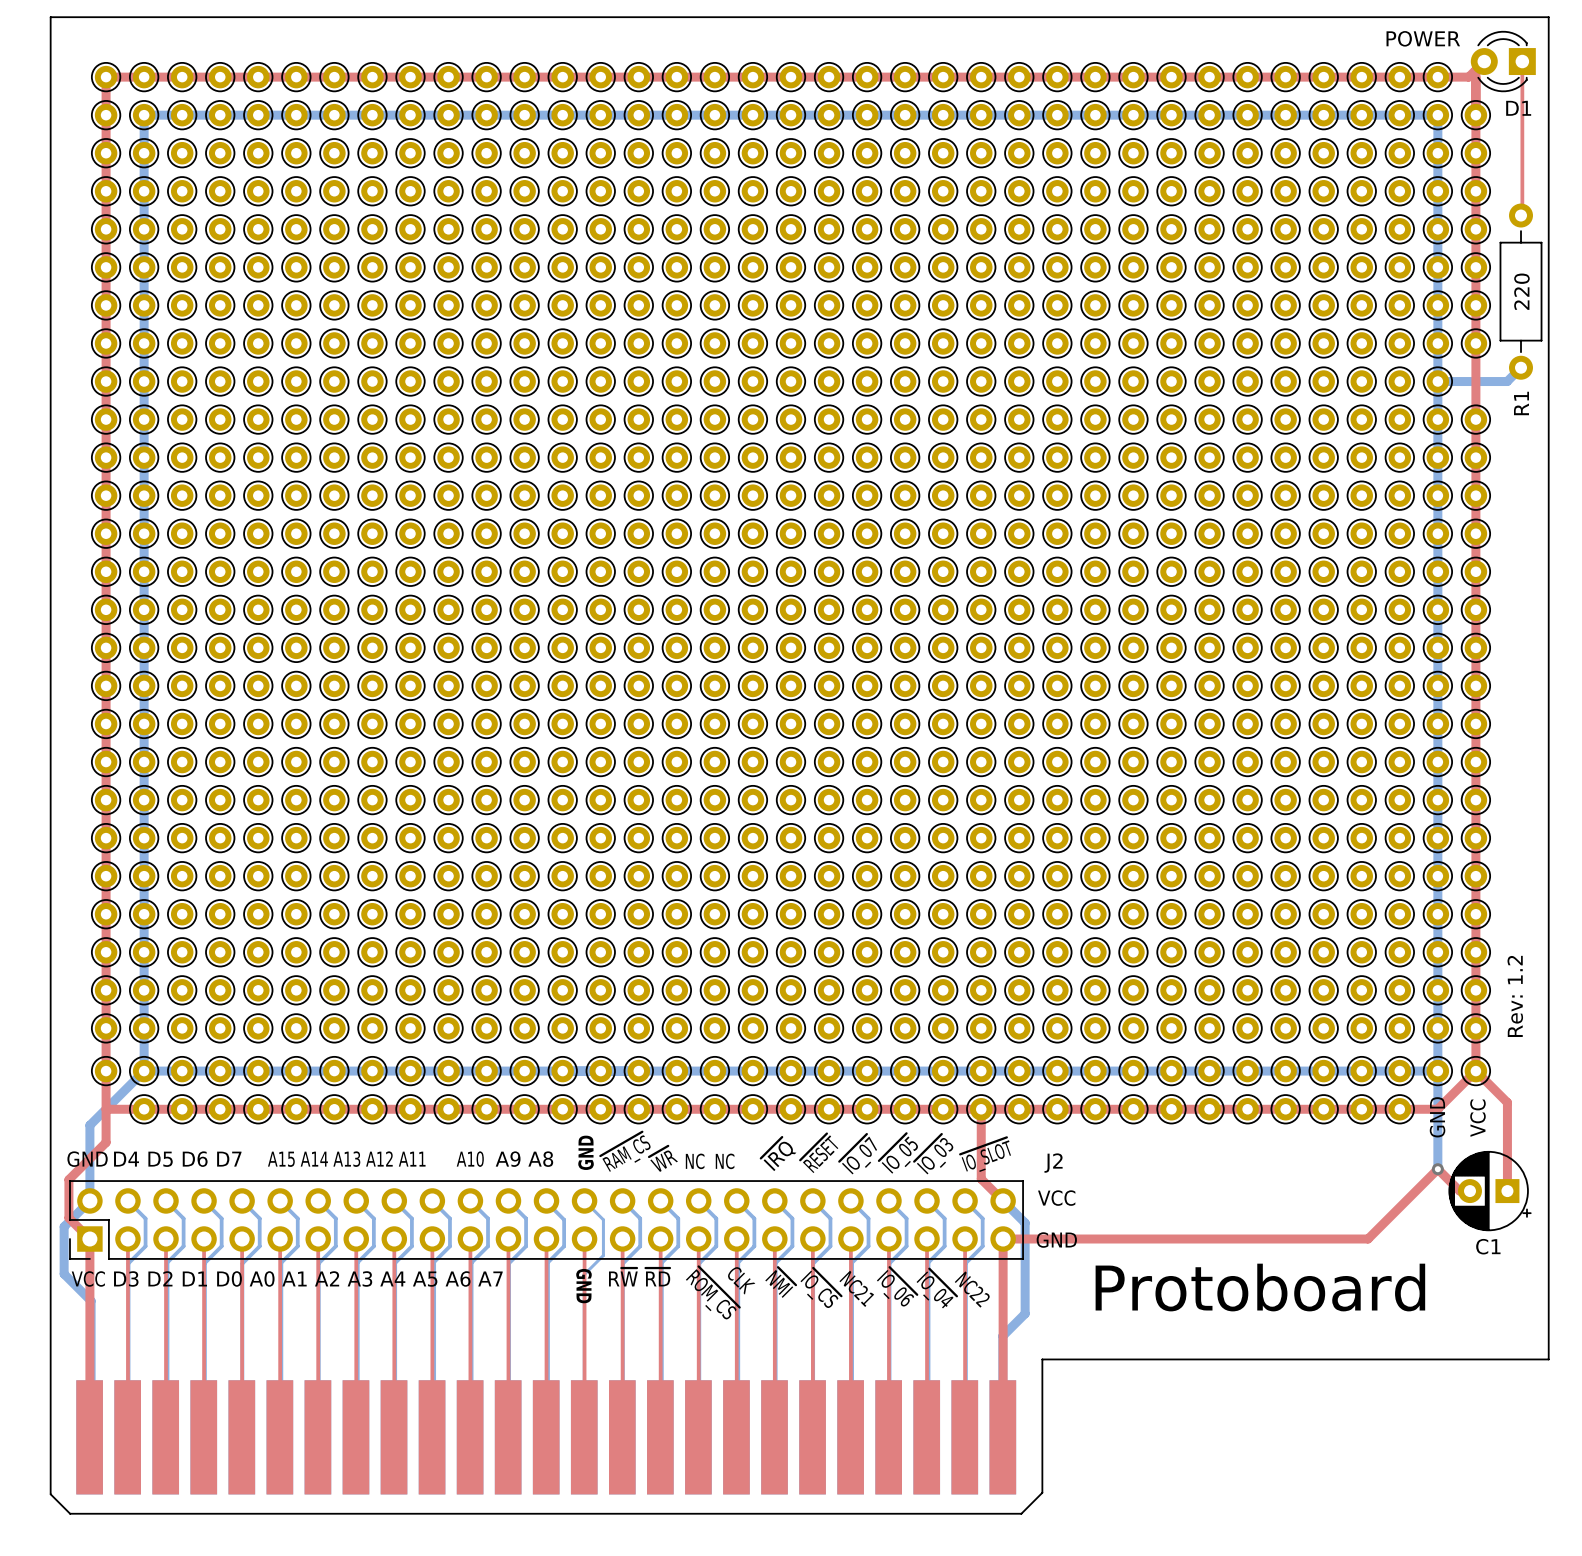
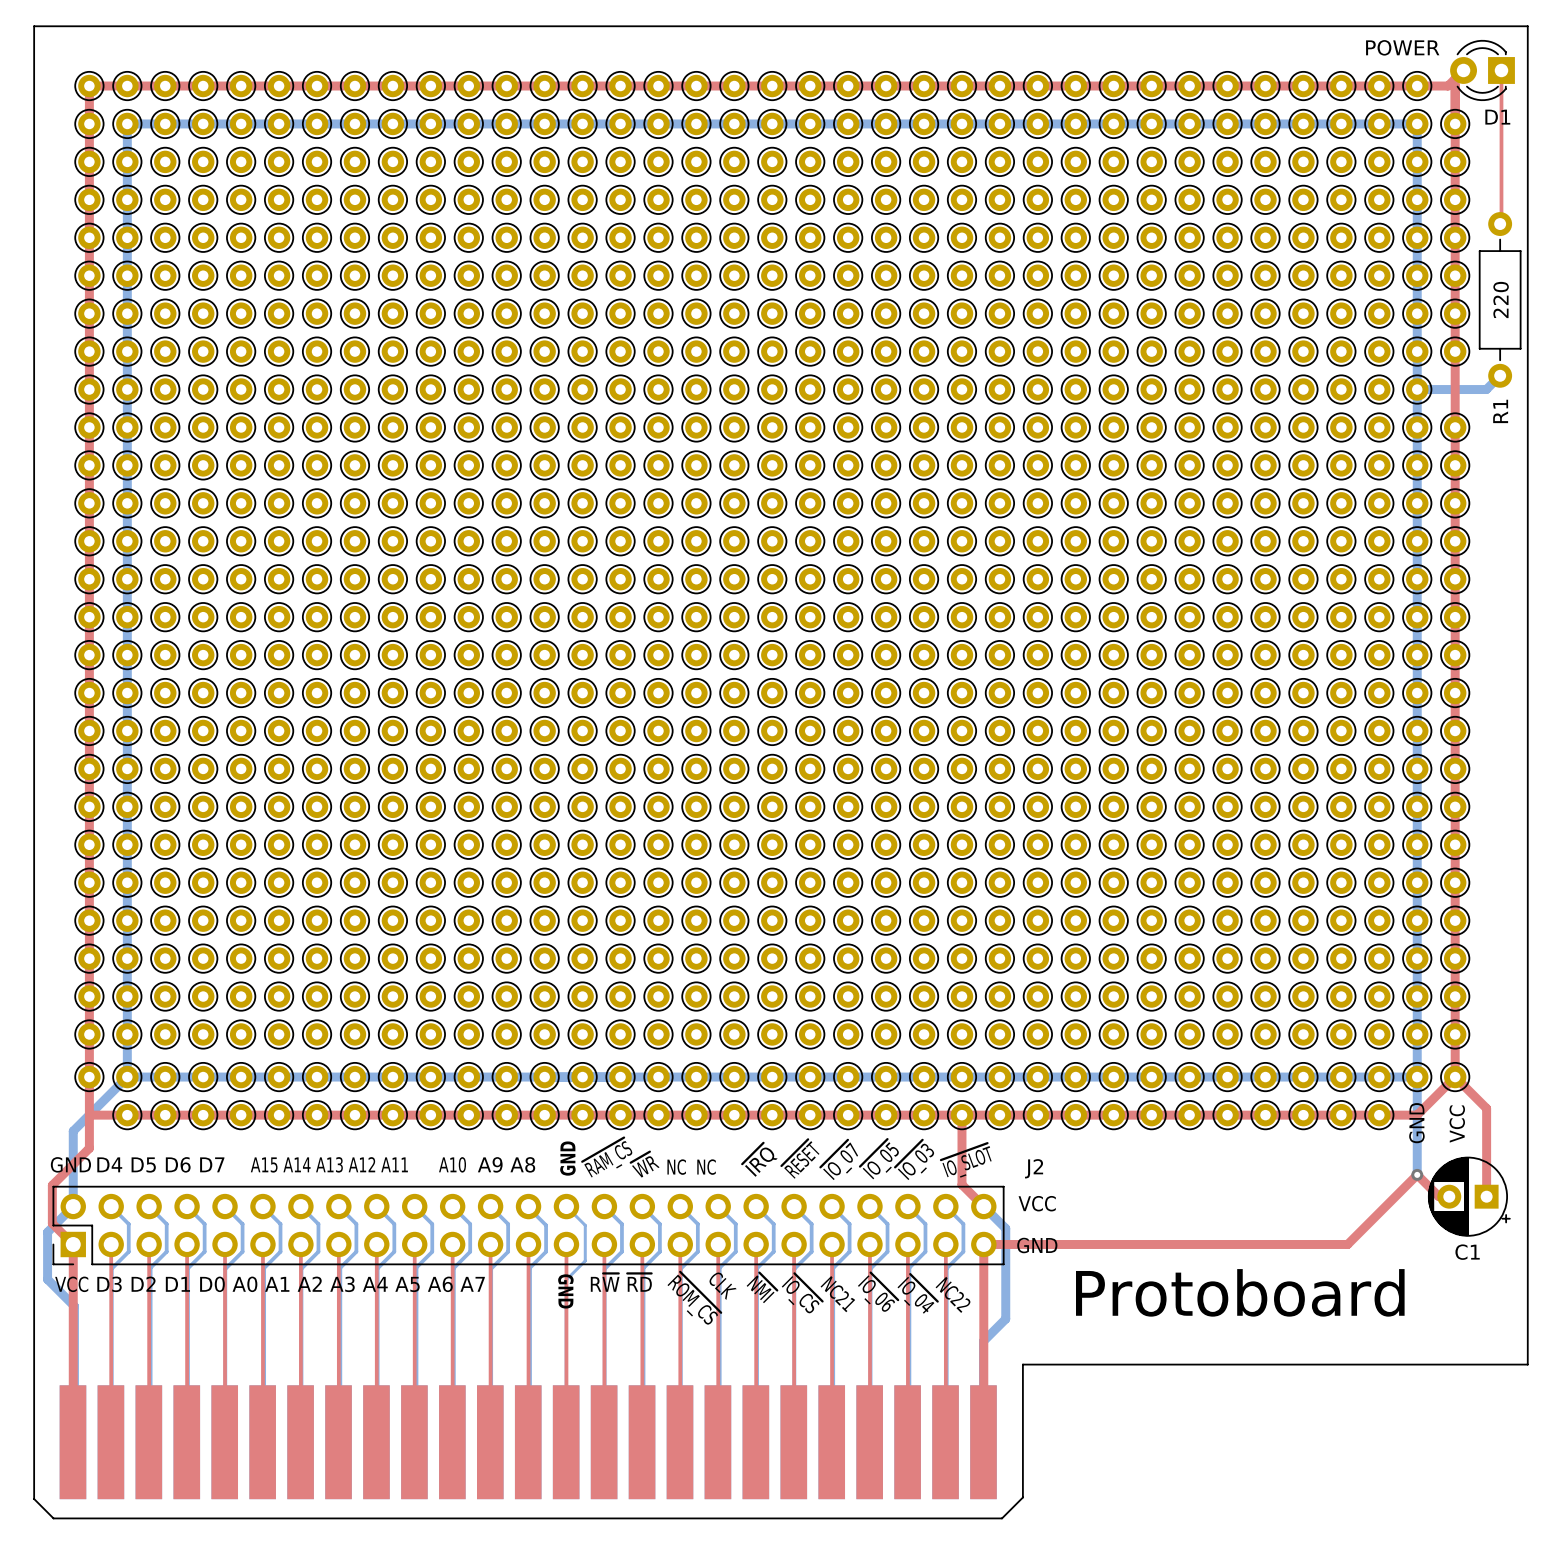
text: Rev: 1.2 (1515, 996) -> none

